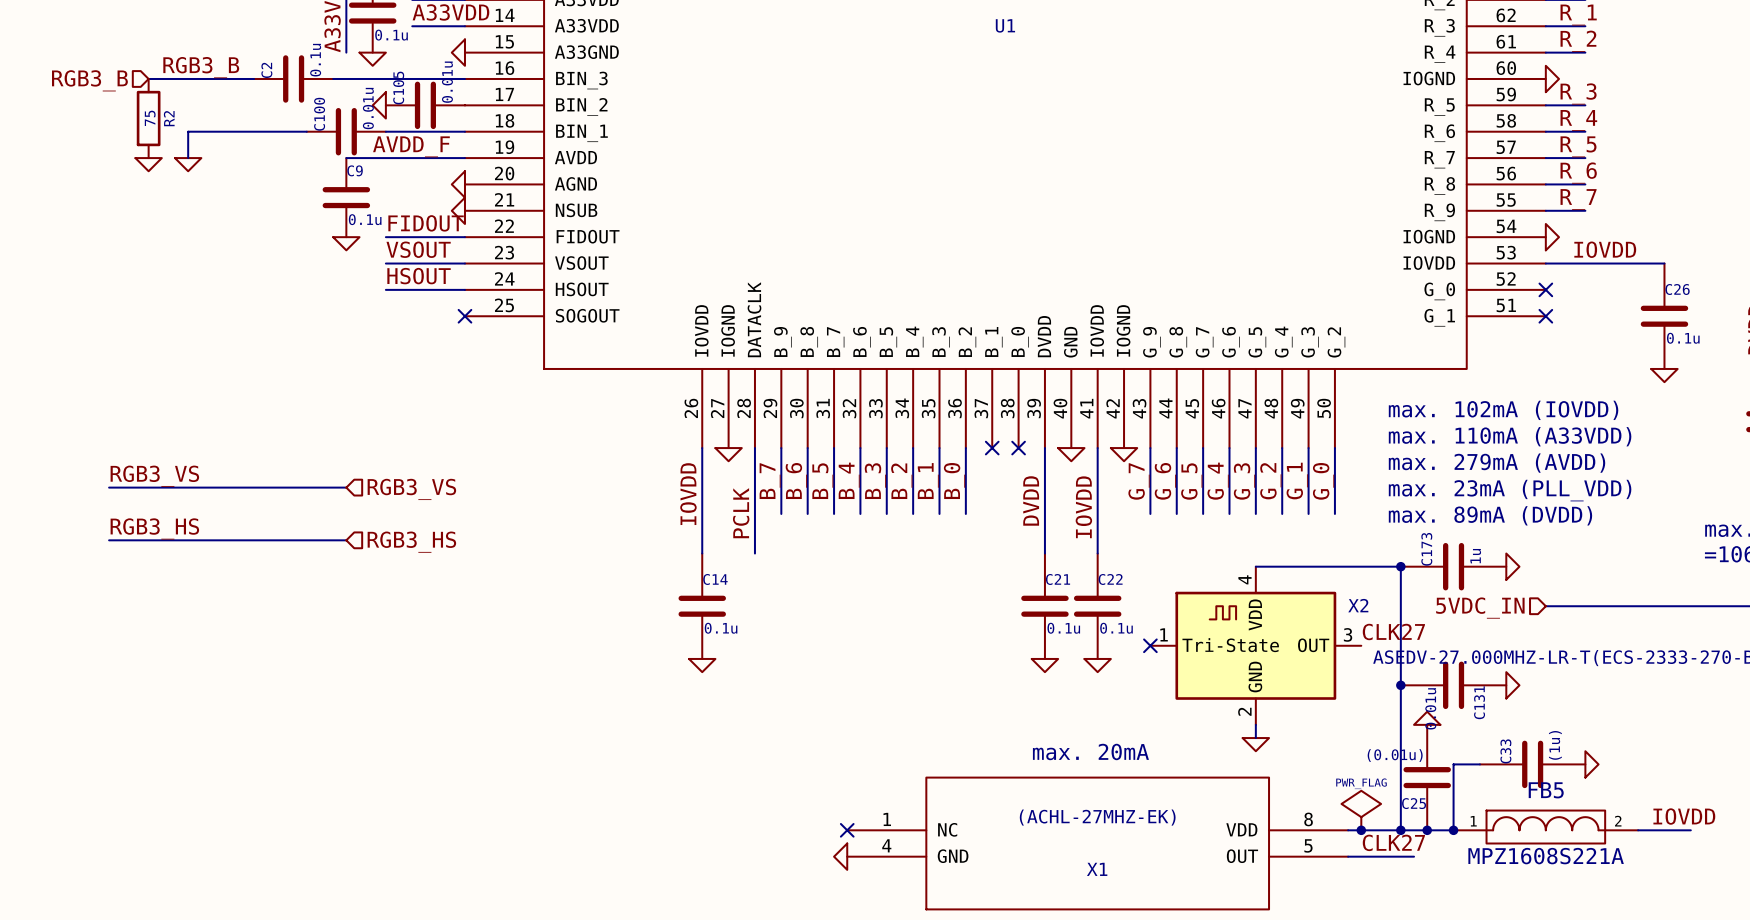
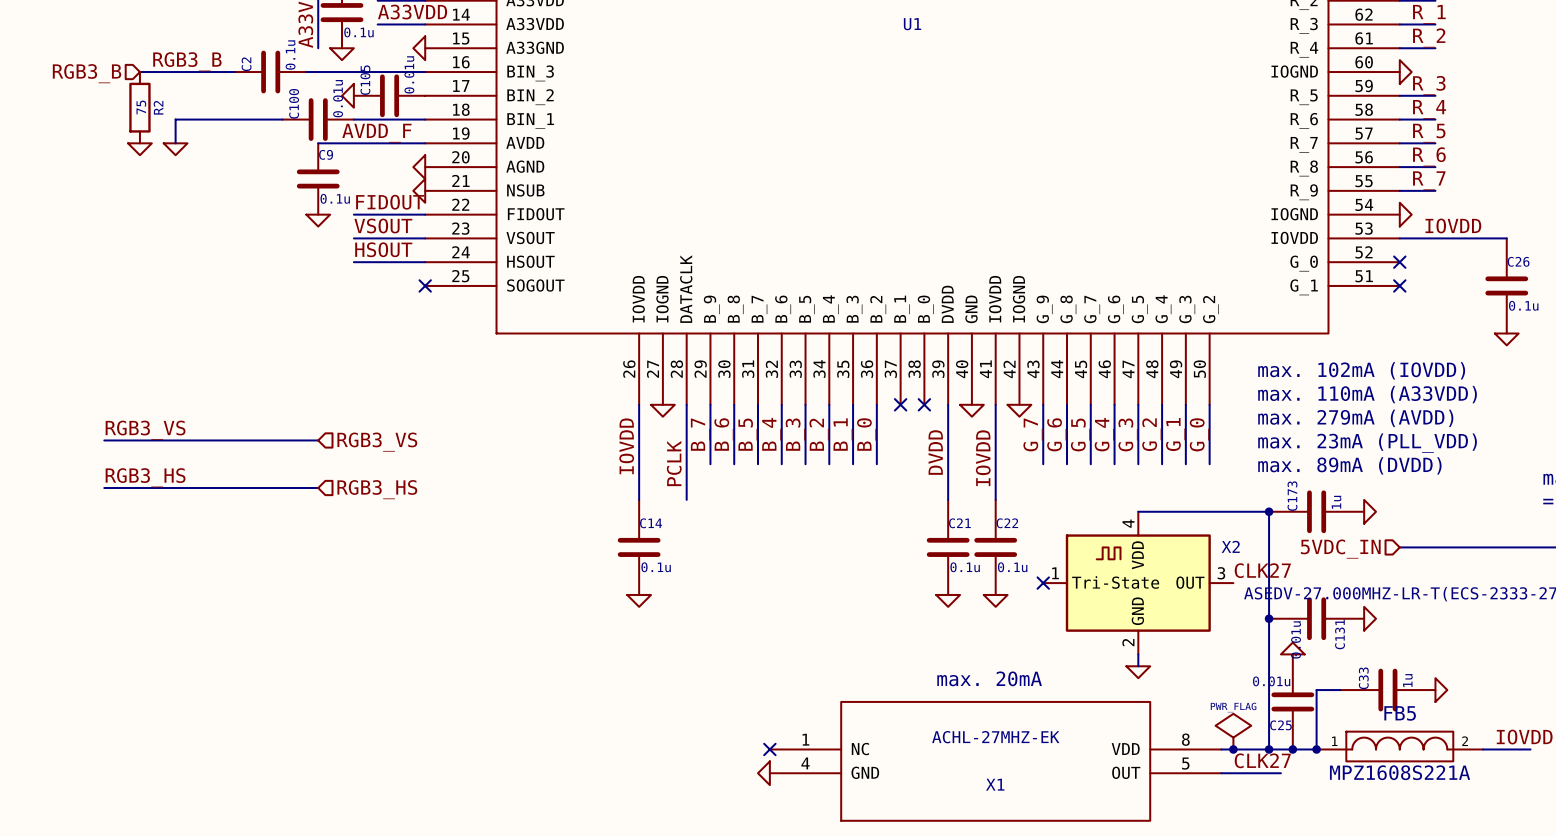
C33 value: (1u) (1555, 745) -> 1u (1407, 680)
C25 value: (0.01u) (1395, 755) -> 0.01u (1271, 681)
X1 value: (ACHL-27MHZ-EK) (1097, 817) -> ACHL-27MHZ-EK (995, 737)

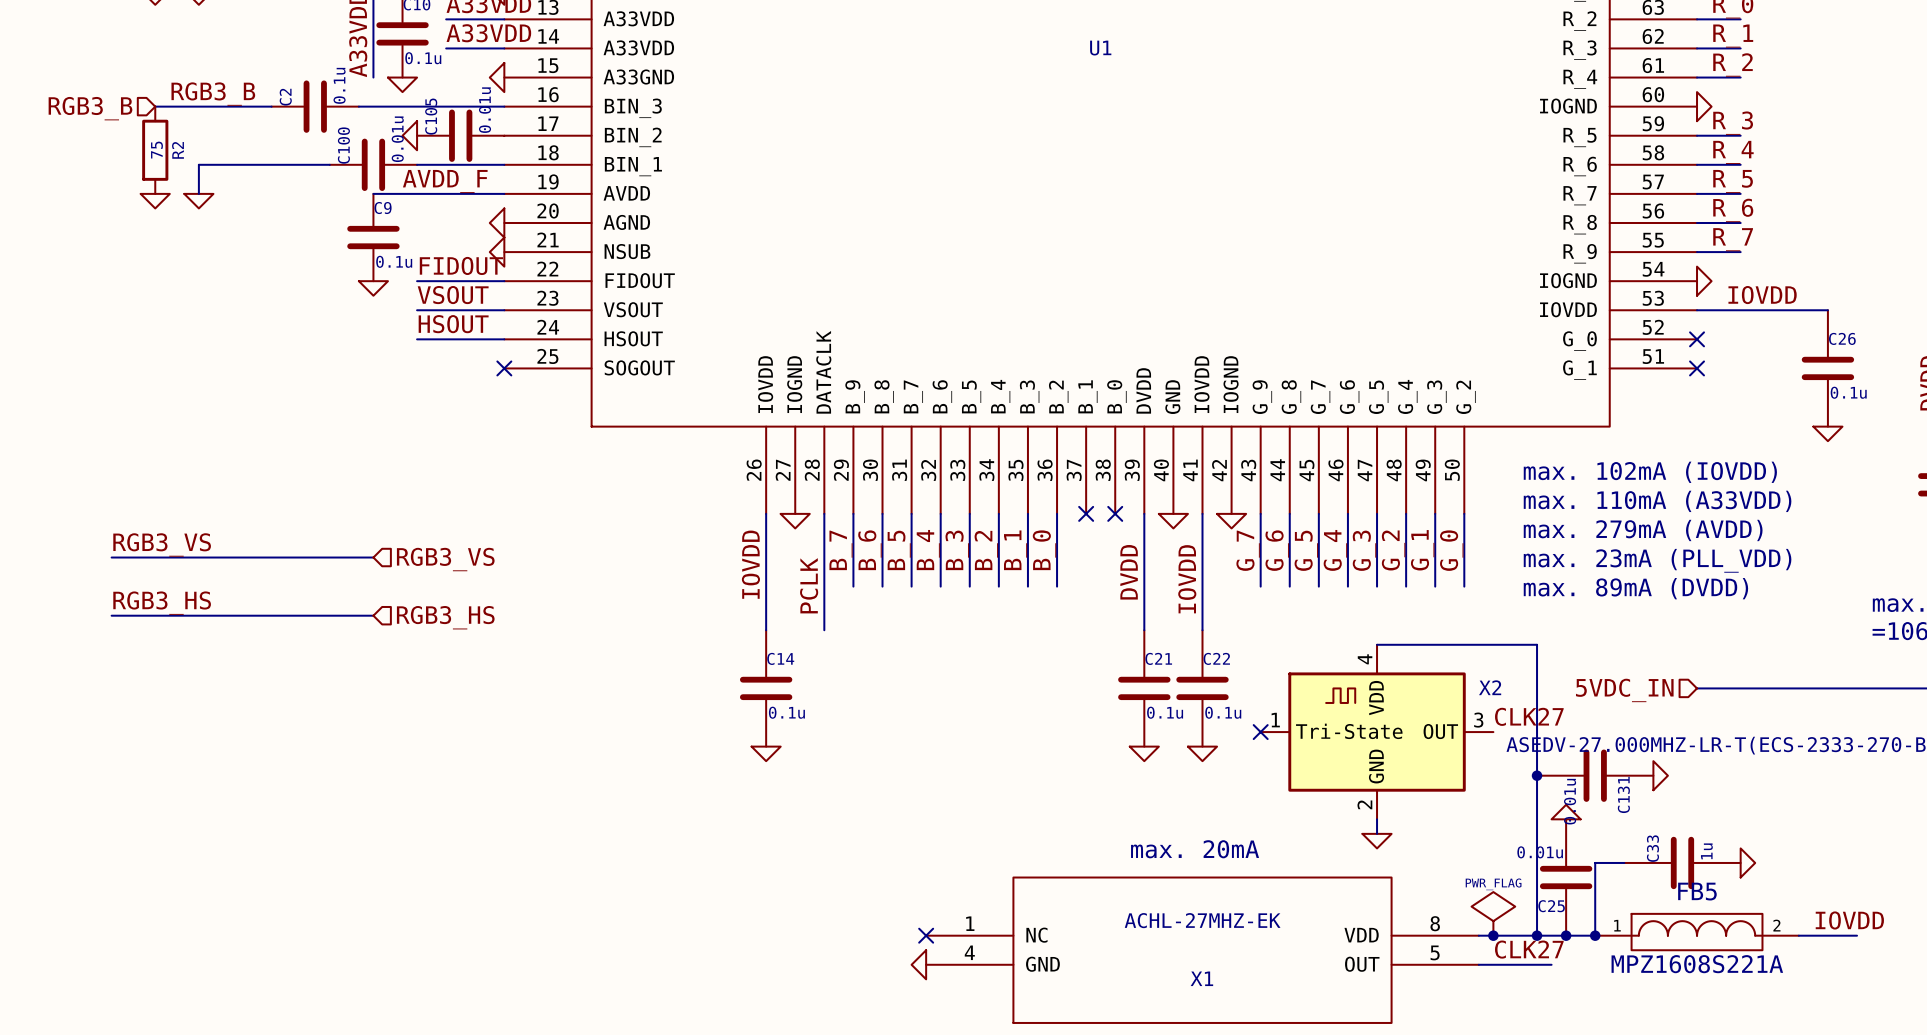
junction: (1269, 511) -> none
C173: 1u (1316, 511) -> none
power symbol: (1370, 511) -> none

